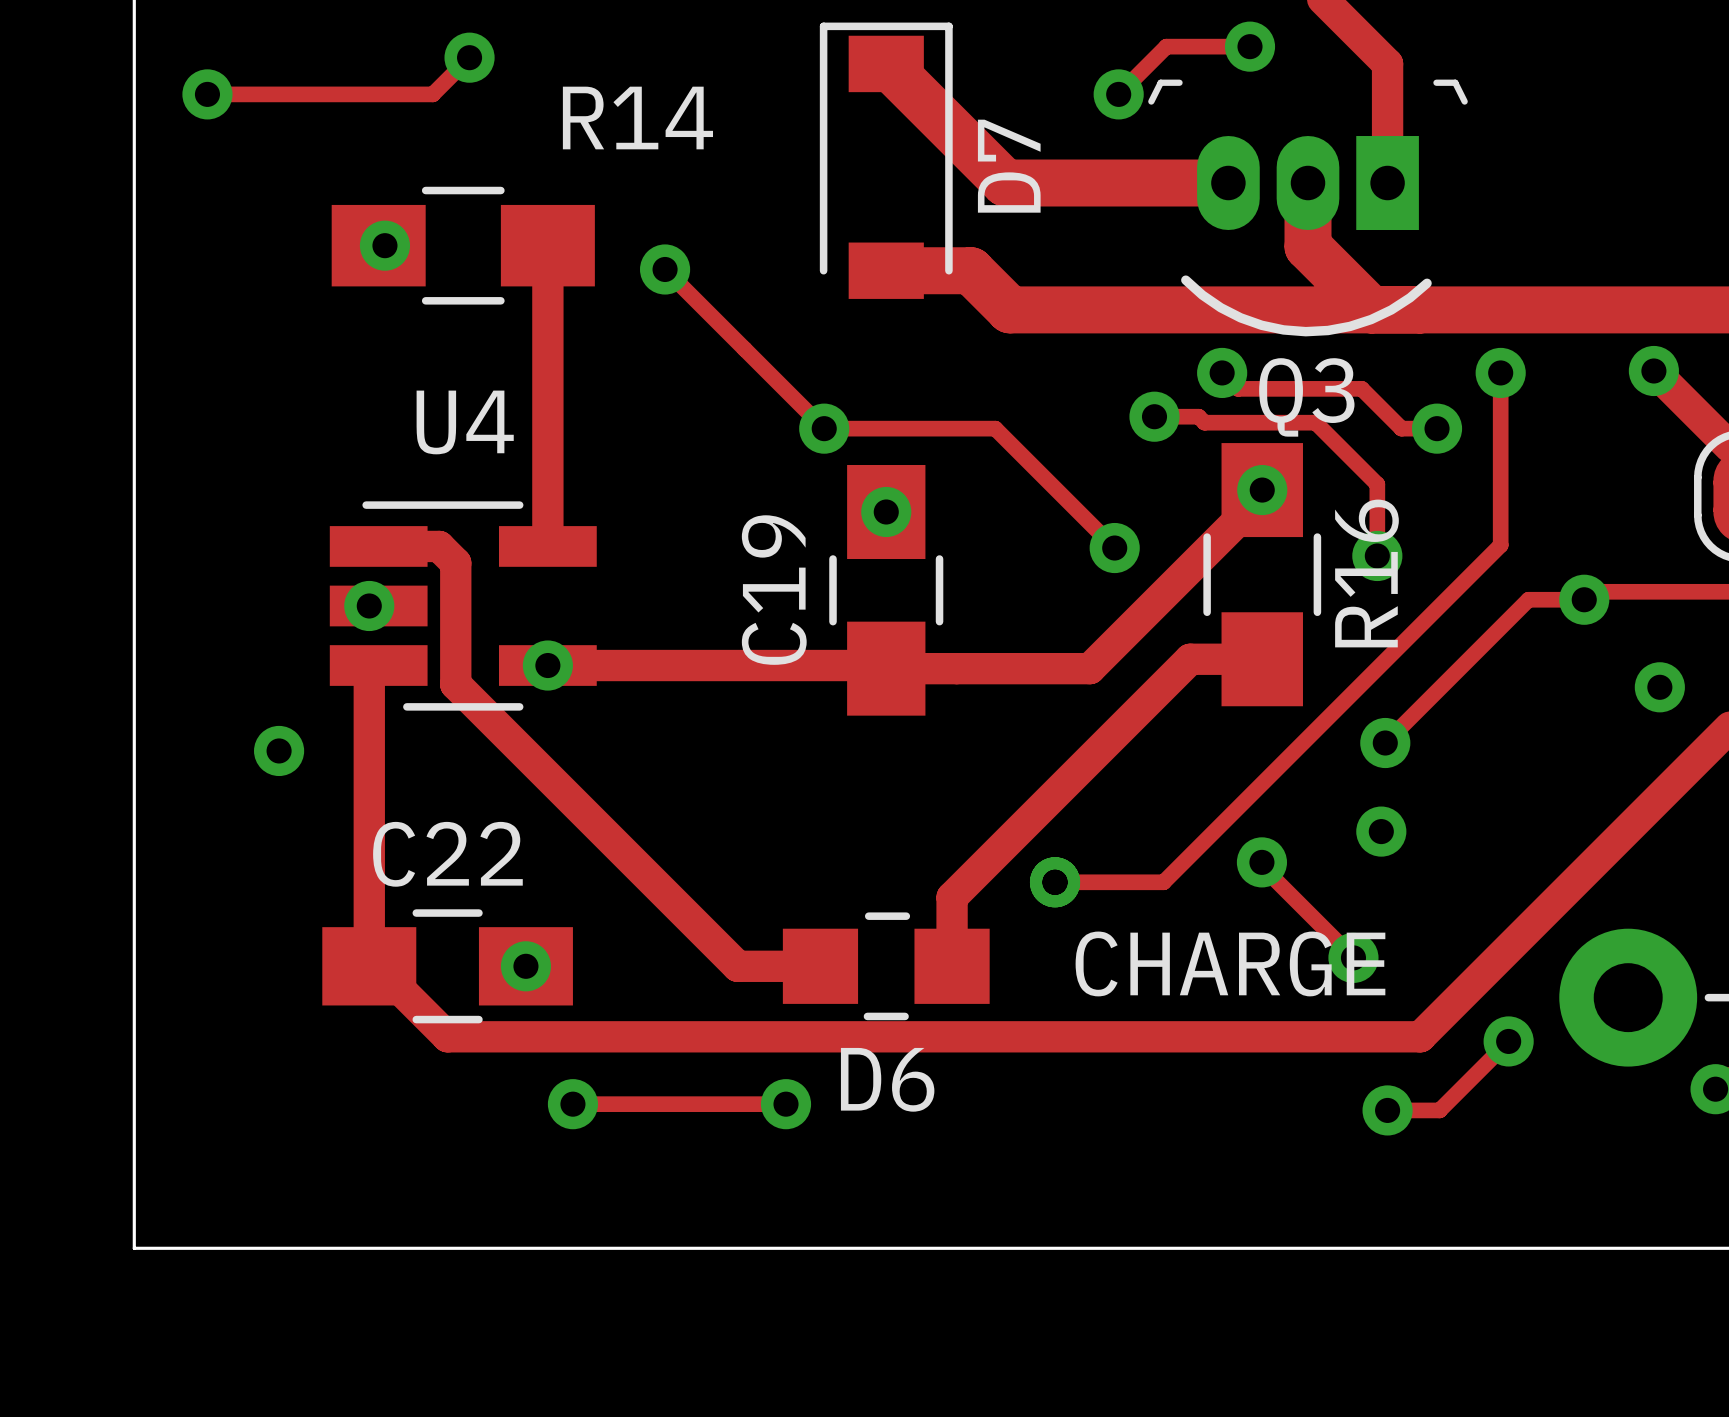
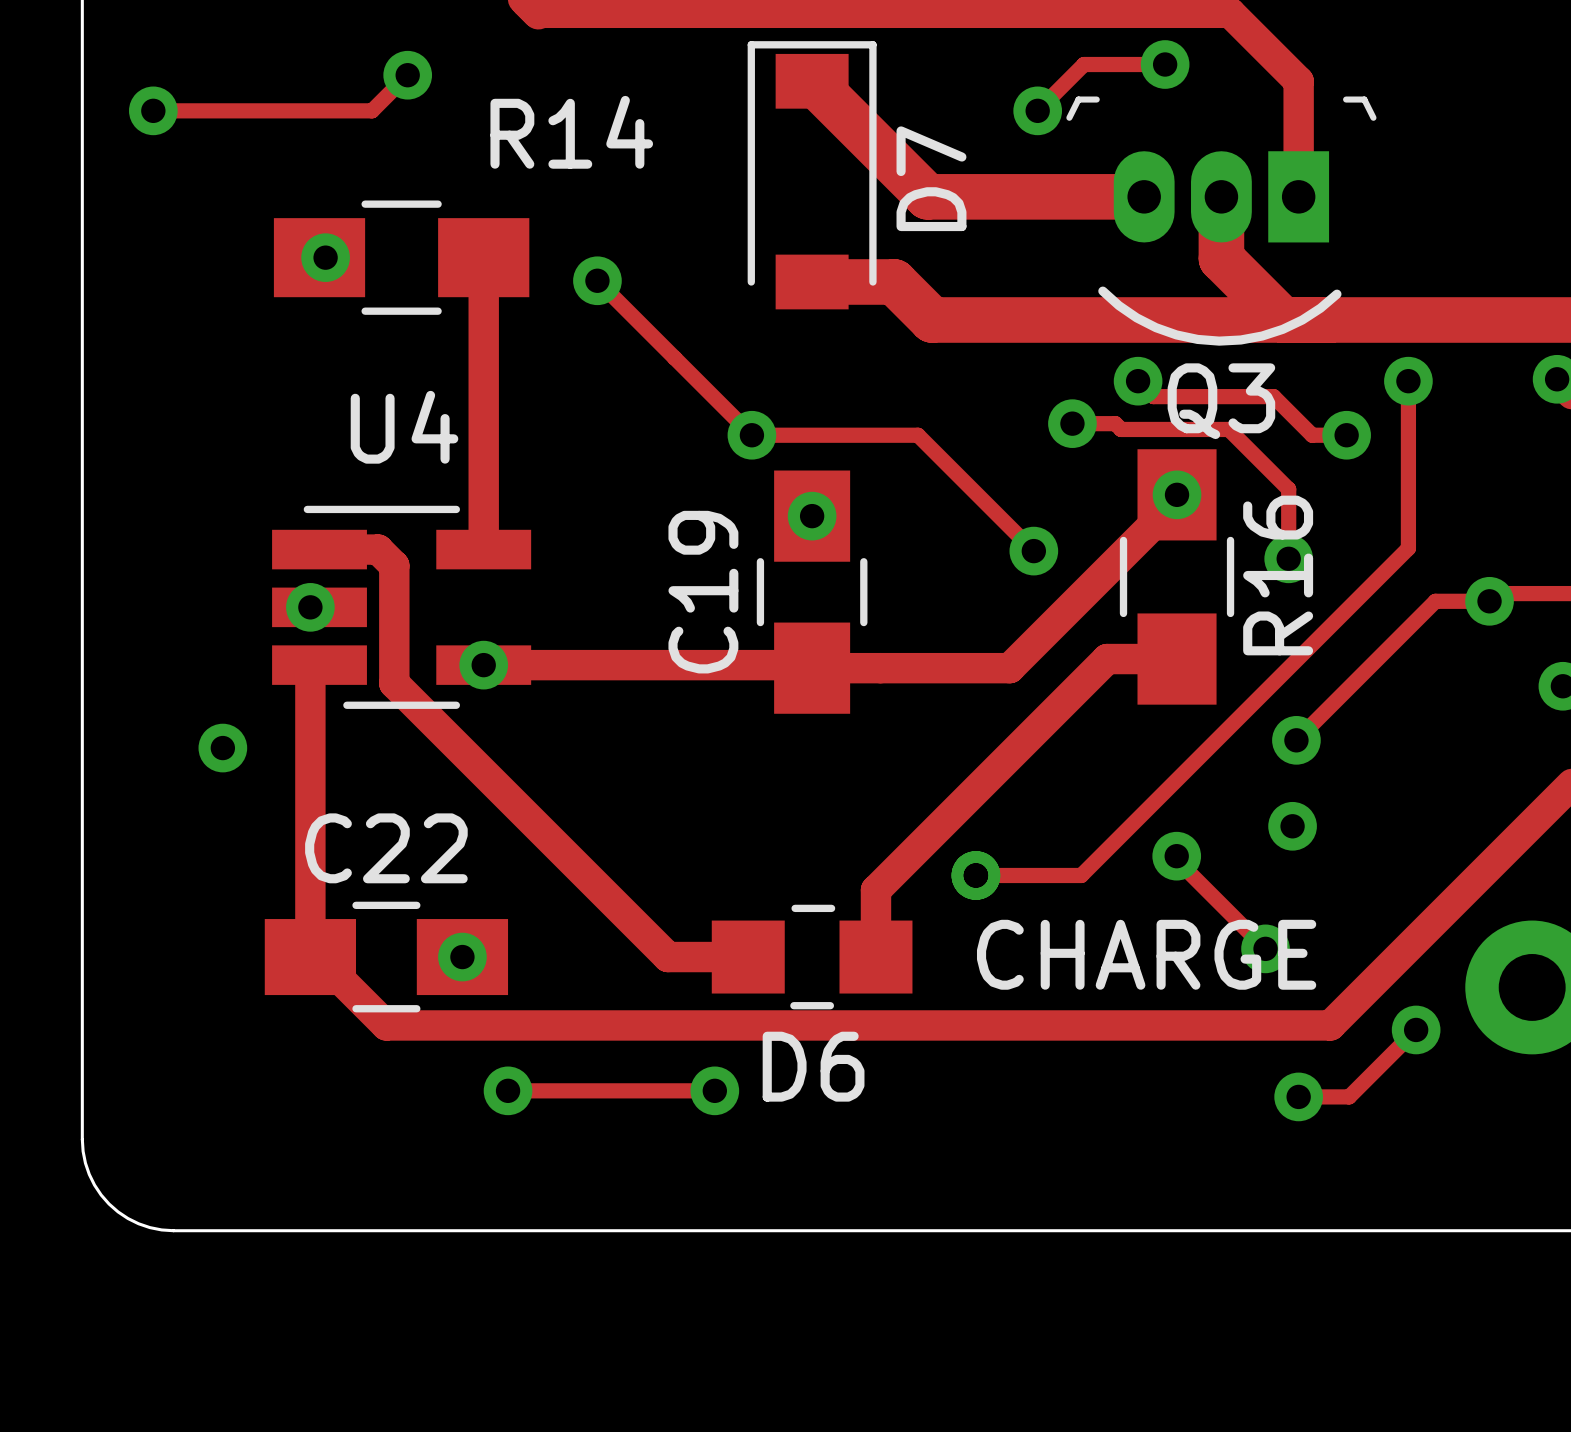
board edge: (134, 1154) (134, 1248) (228, 1248) -> (82, 1139) (83, 1151) (89, 1174) (101, 1195) (109, 1204) (118, 1211) (138, 1223) (149, 1227) (173, 1230)

